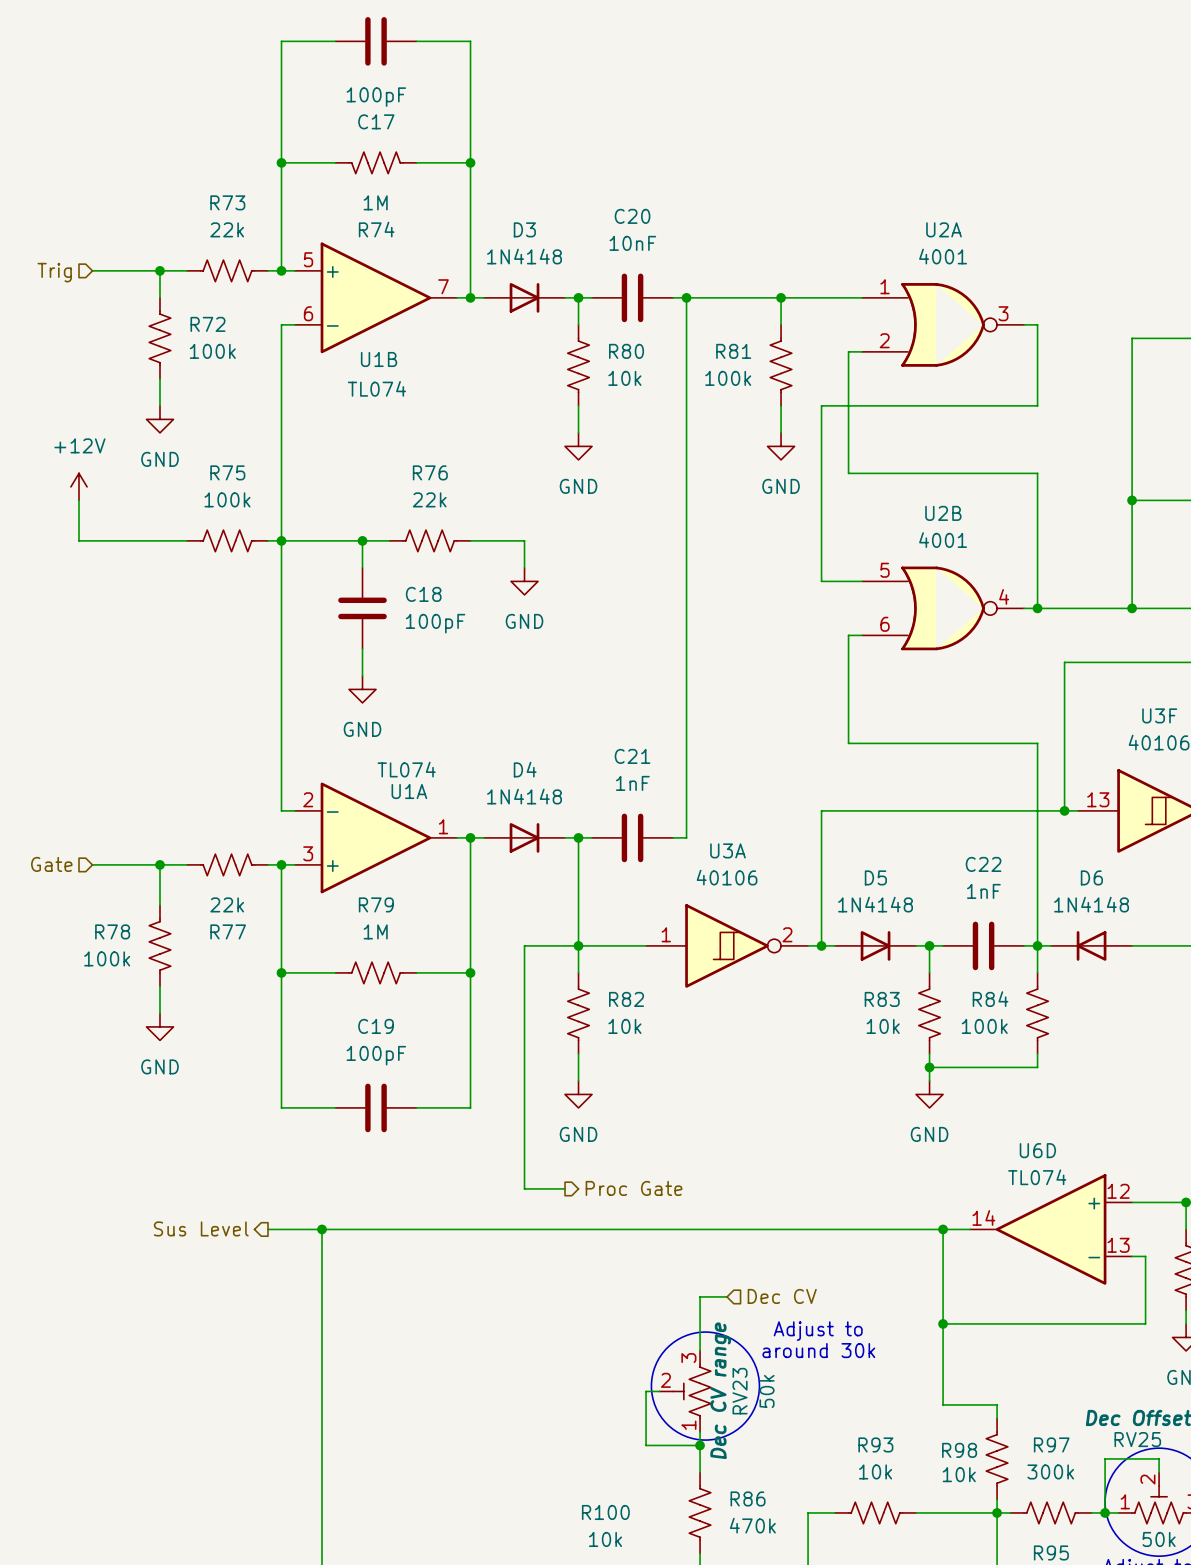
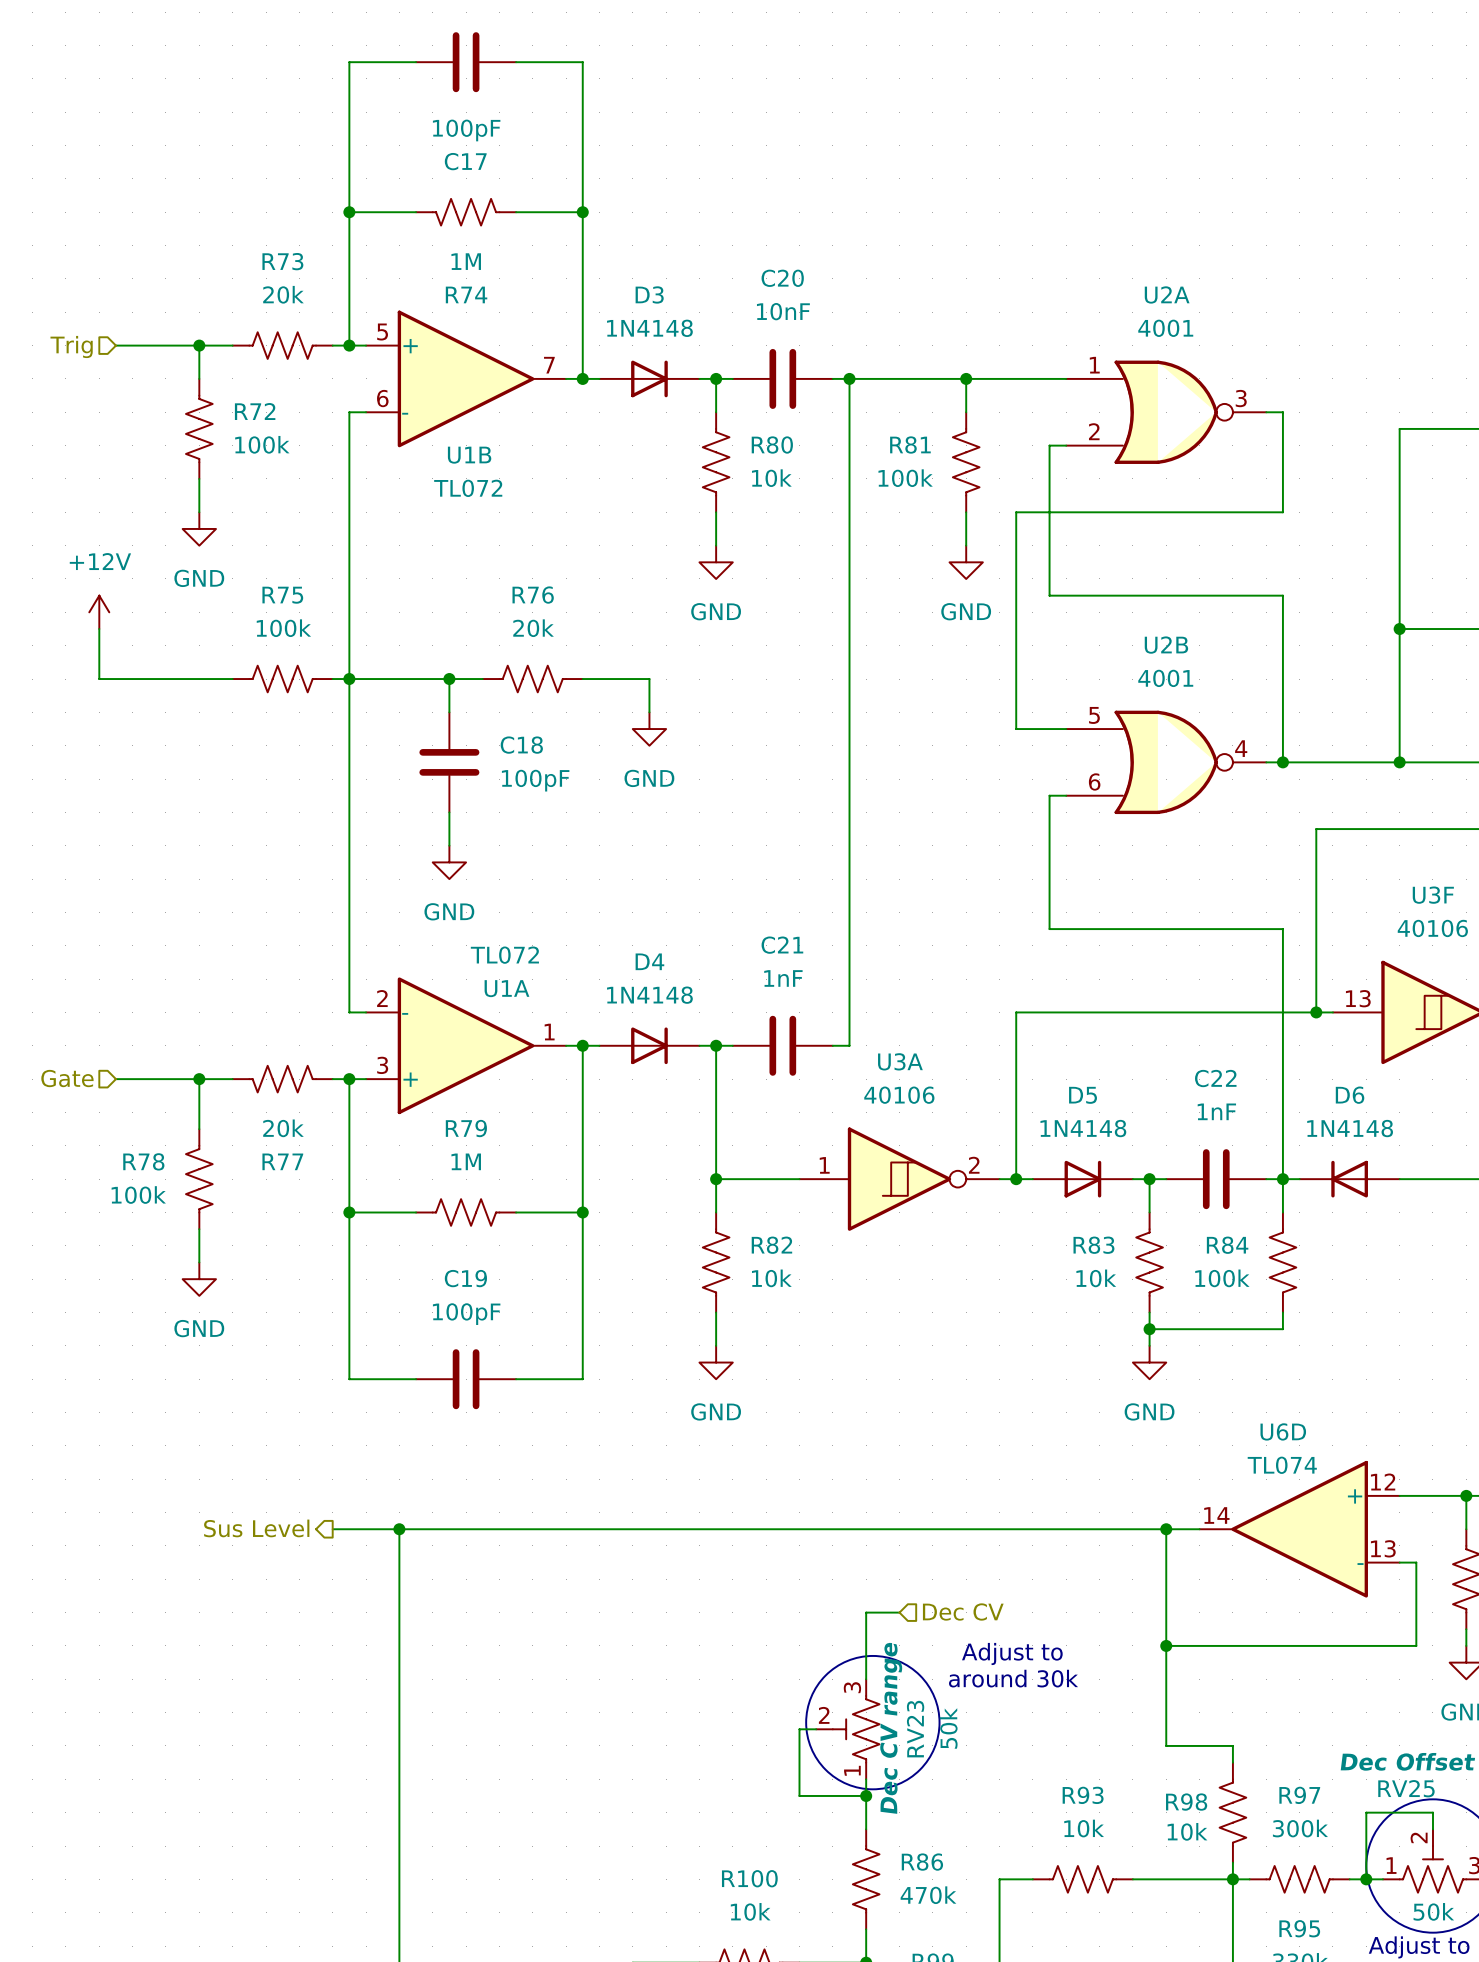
R73 value: 22k (227, 229) -> 20k (283, 294)
U1B value: TL074 (376, 388) -> TL072 (468, 488)
R76 value: 22k (429, 499) -> 20k (533, 628)
U1A value: TL074 (406, 769) -> TL072 (504, 955)
R77 value: 22k (227, 904) -> 20k (283, 1128)
wire: (578, 945) (524, 945) (524, 1188) (565, 1188) -> none
hierarchical label: Proc Gate (634, 1188) -> none

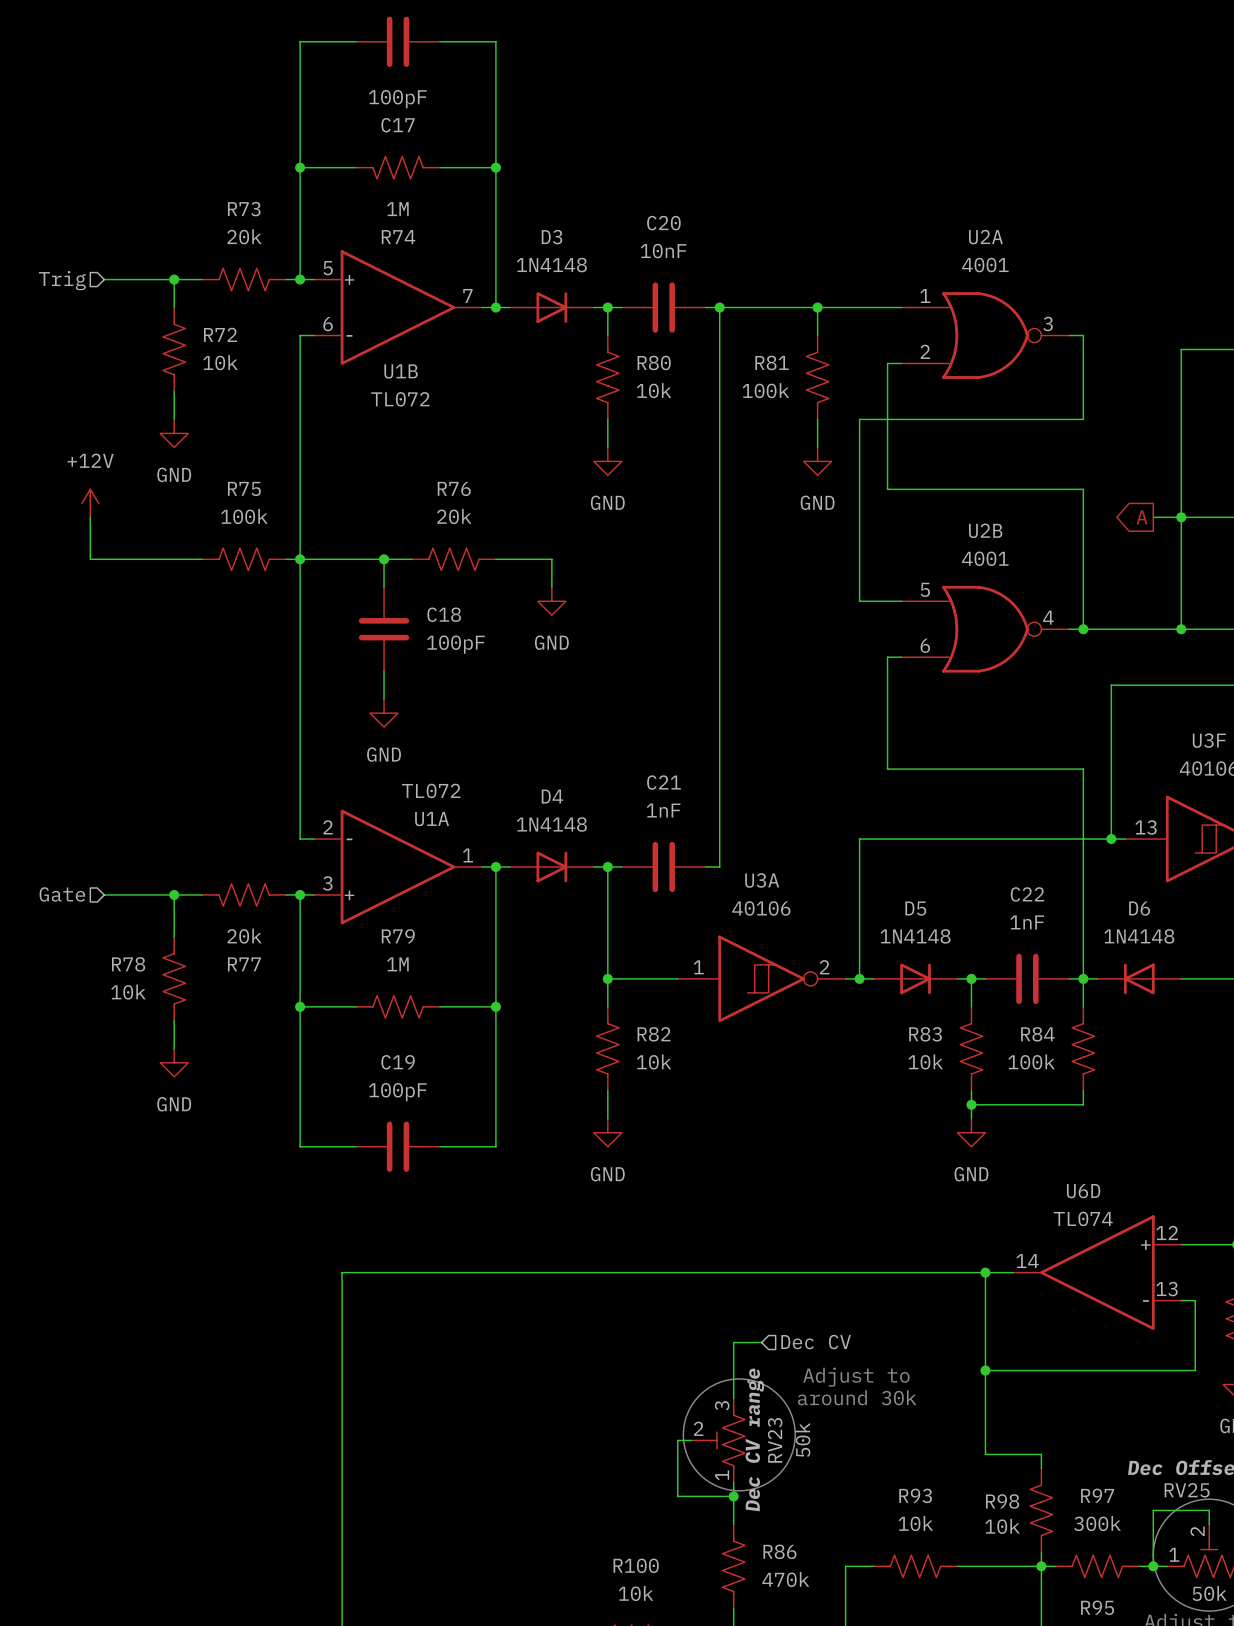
R72 value: 100k (262, 444) -> 10k (220, 362)
global label: none -> A (1142, 517)
wire: none -> (1153, 517) (1181, 517)
R78 value: 100k (138, 1195) -> 10k (128, 992)
hierarchical label: Sus Level (256, 1528) -> none
wire: (332, 1529) (399, 1529) -> none
junction: (399, 1529) -> none

